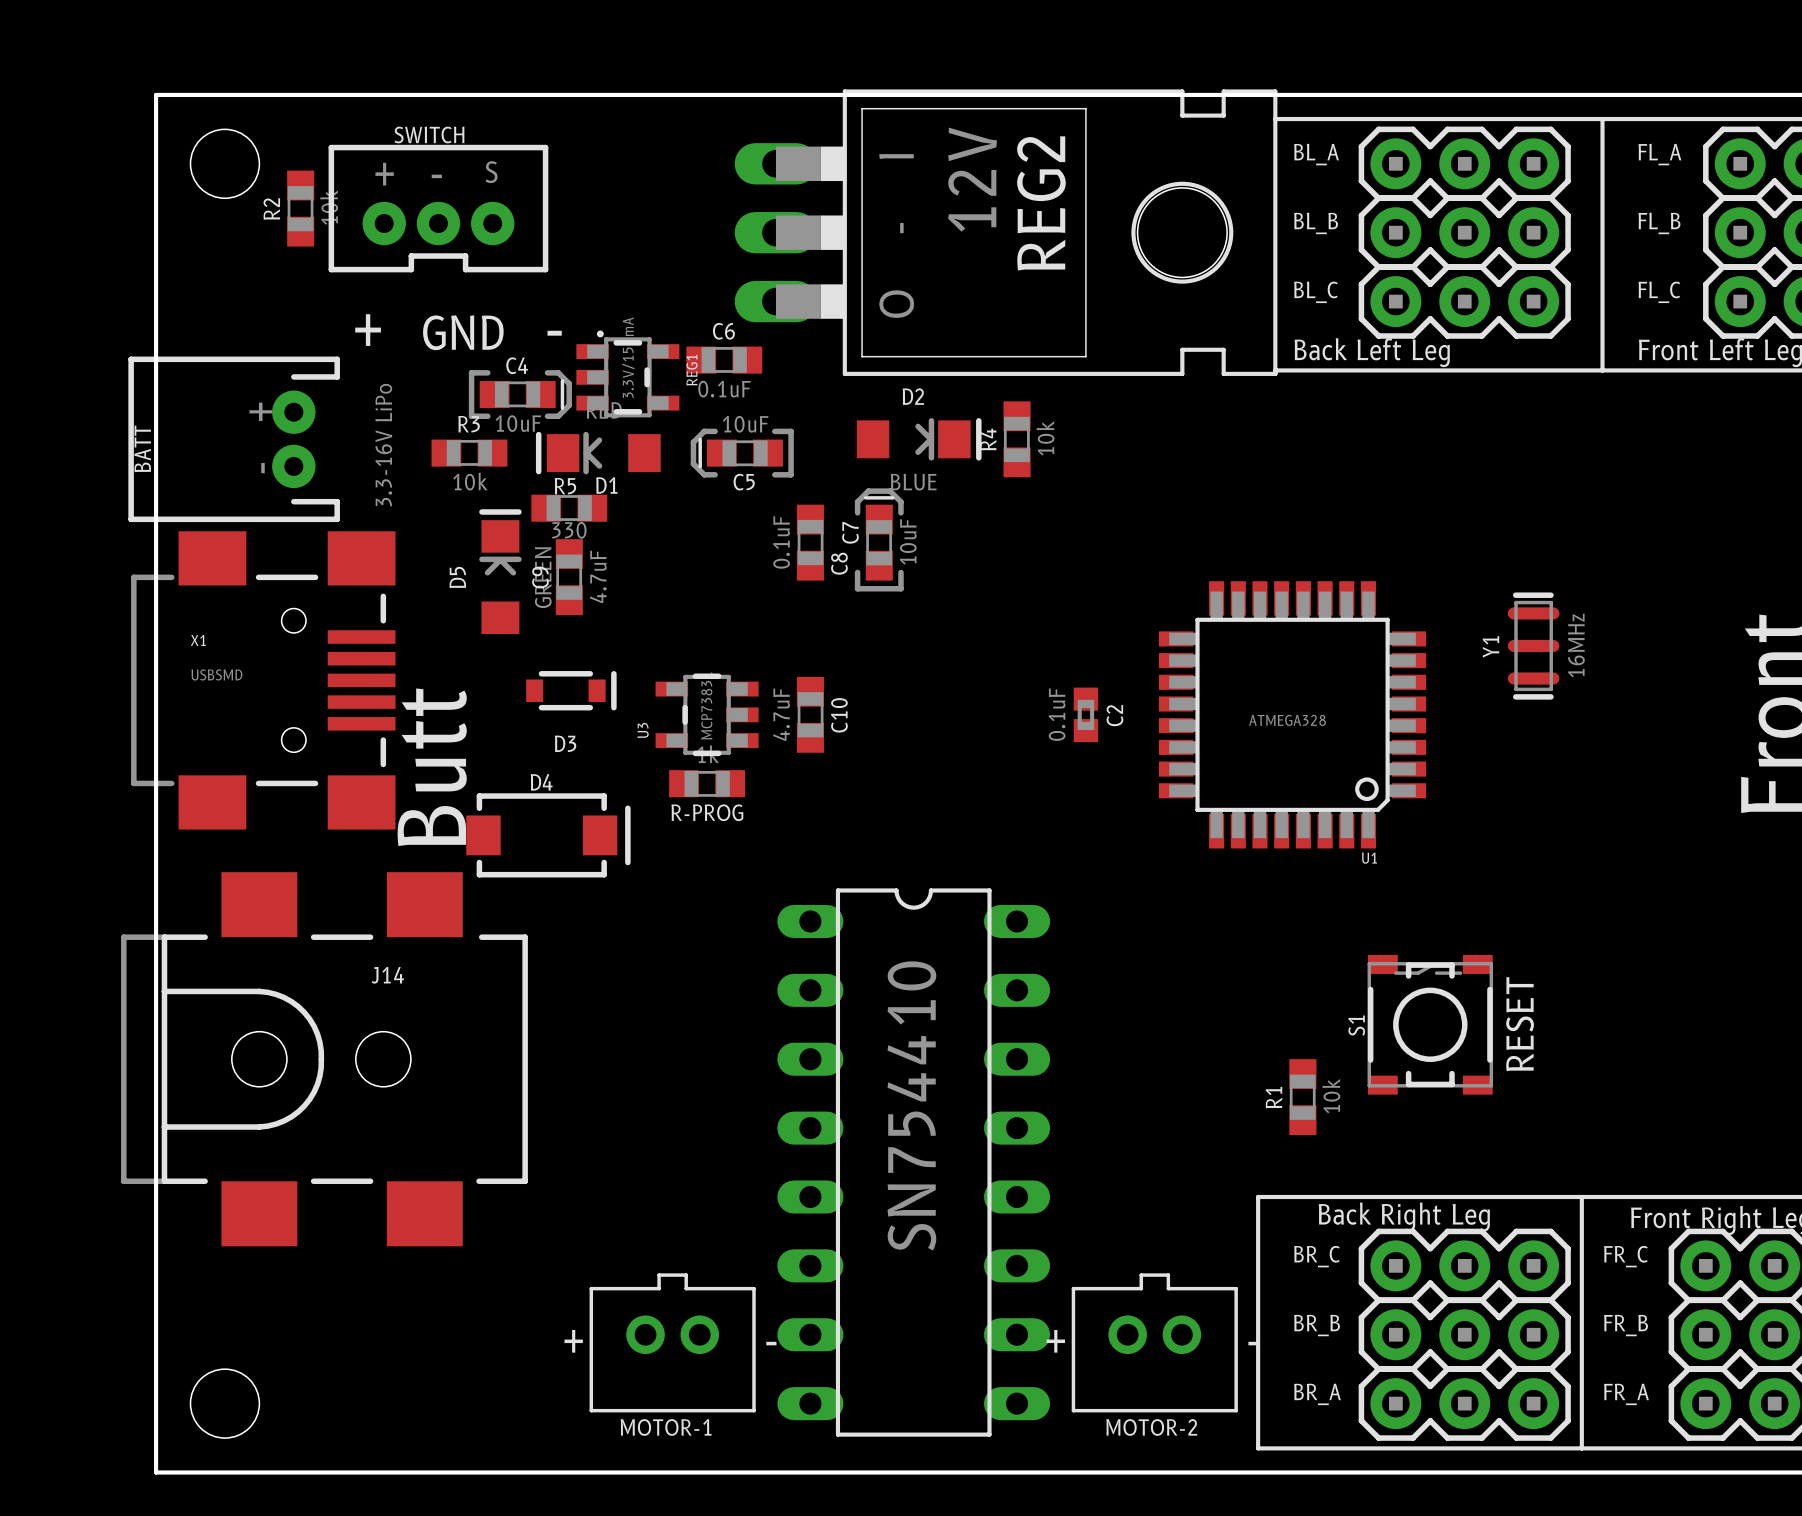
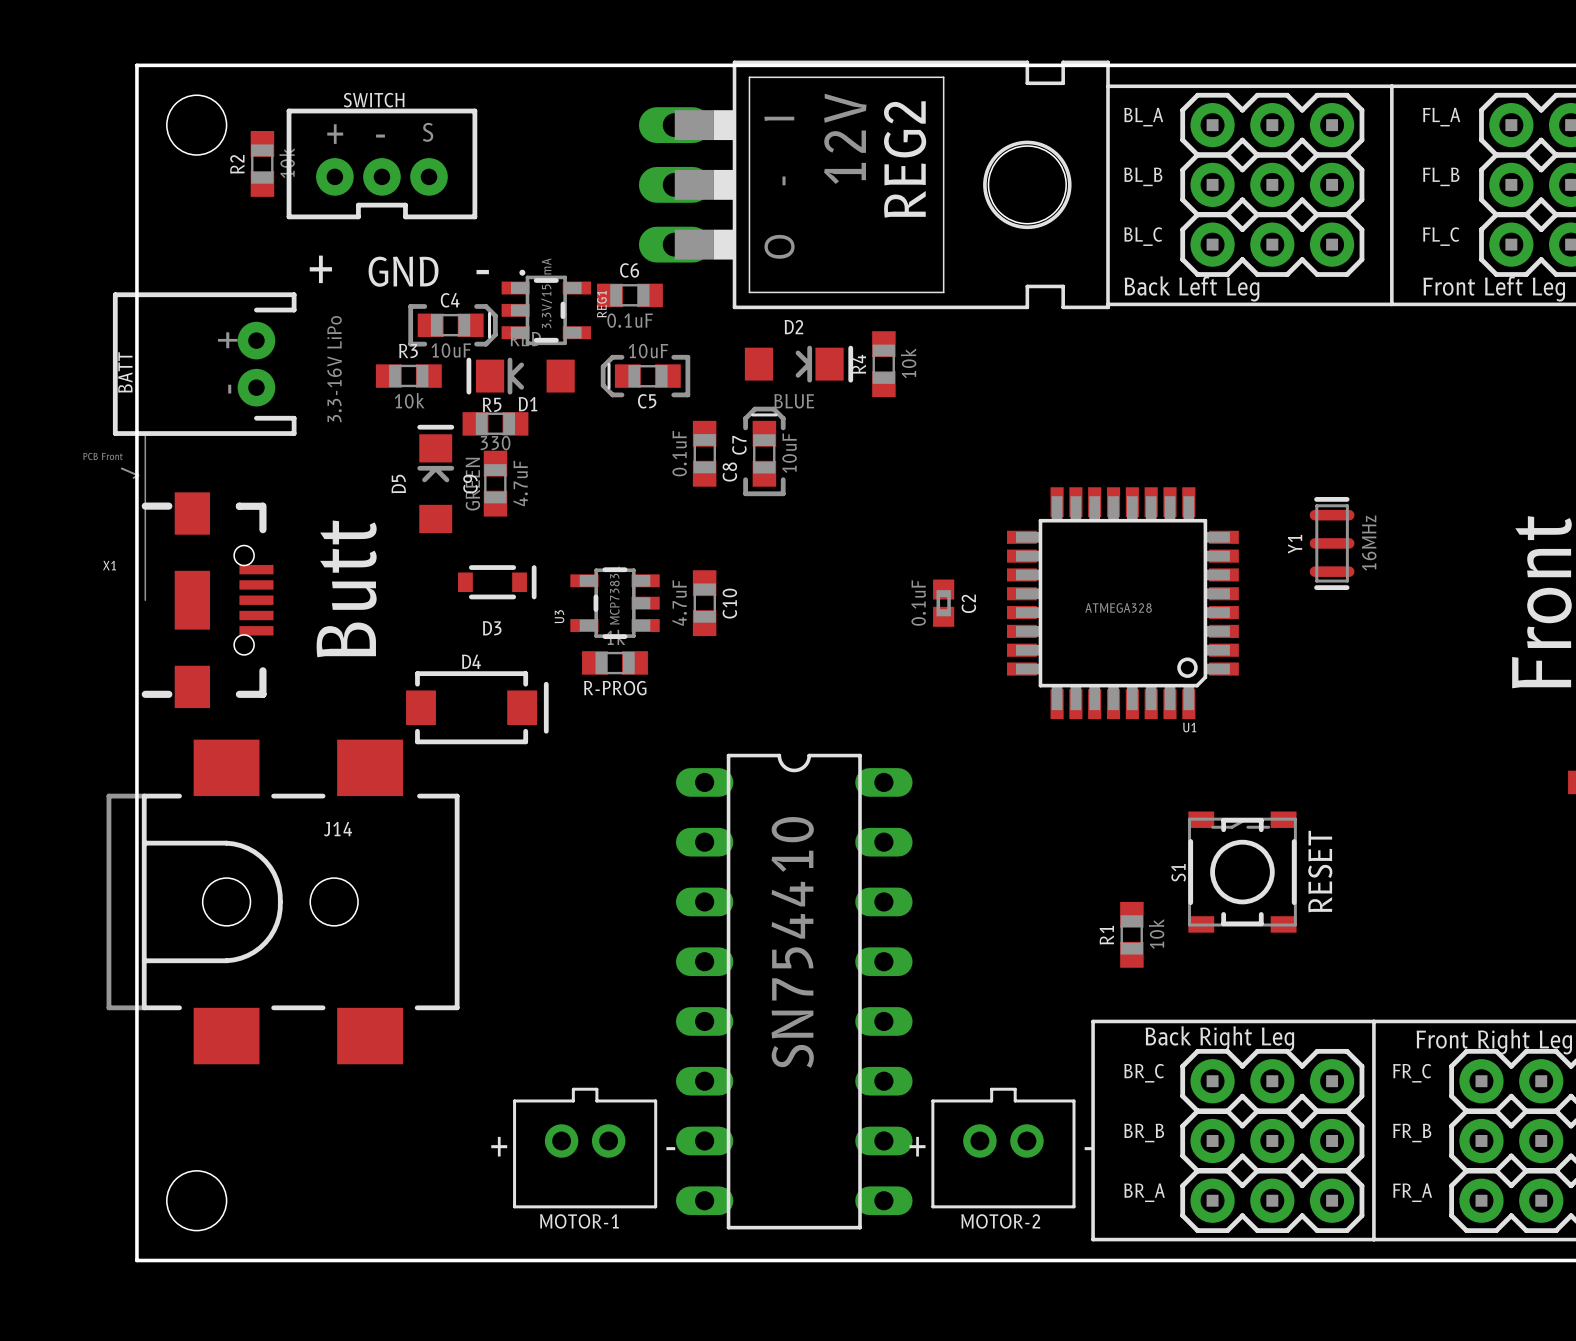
X1 footprint: [131, 531, 396, 830] -> [120, 435, 274, 709]
X1 value: USBSMD (216, 674) -> none
text position: Butt (432, 767) -> Butt (346, 588)

